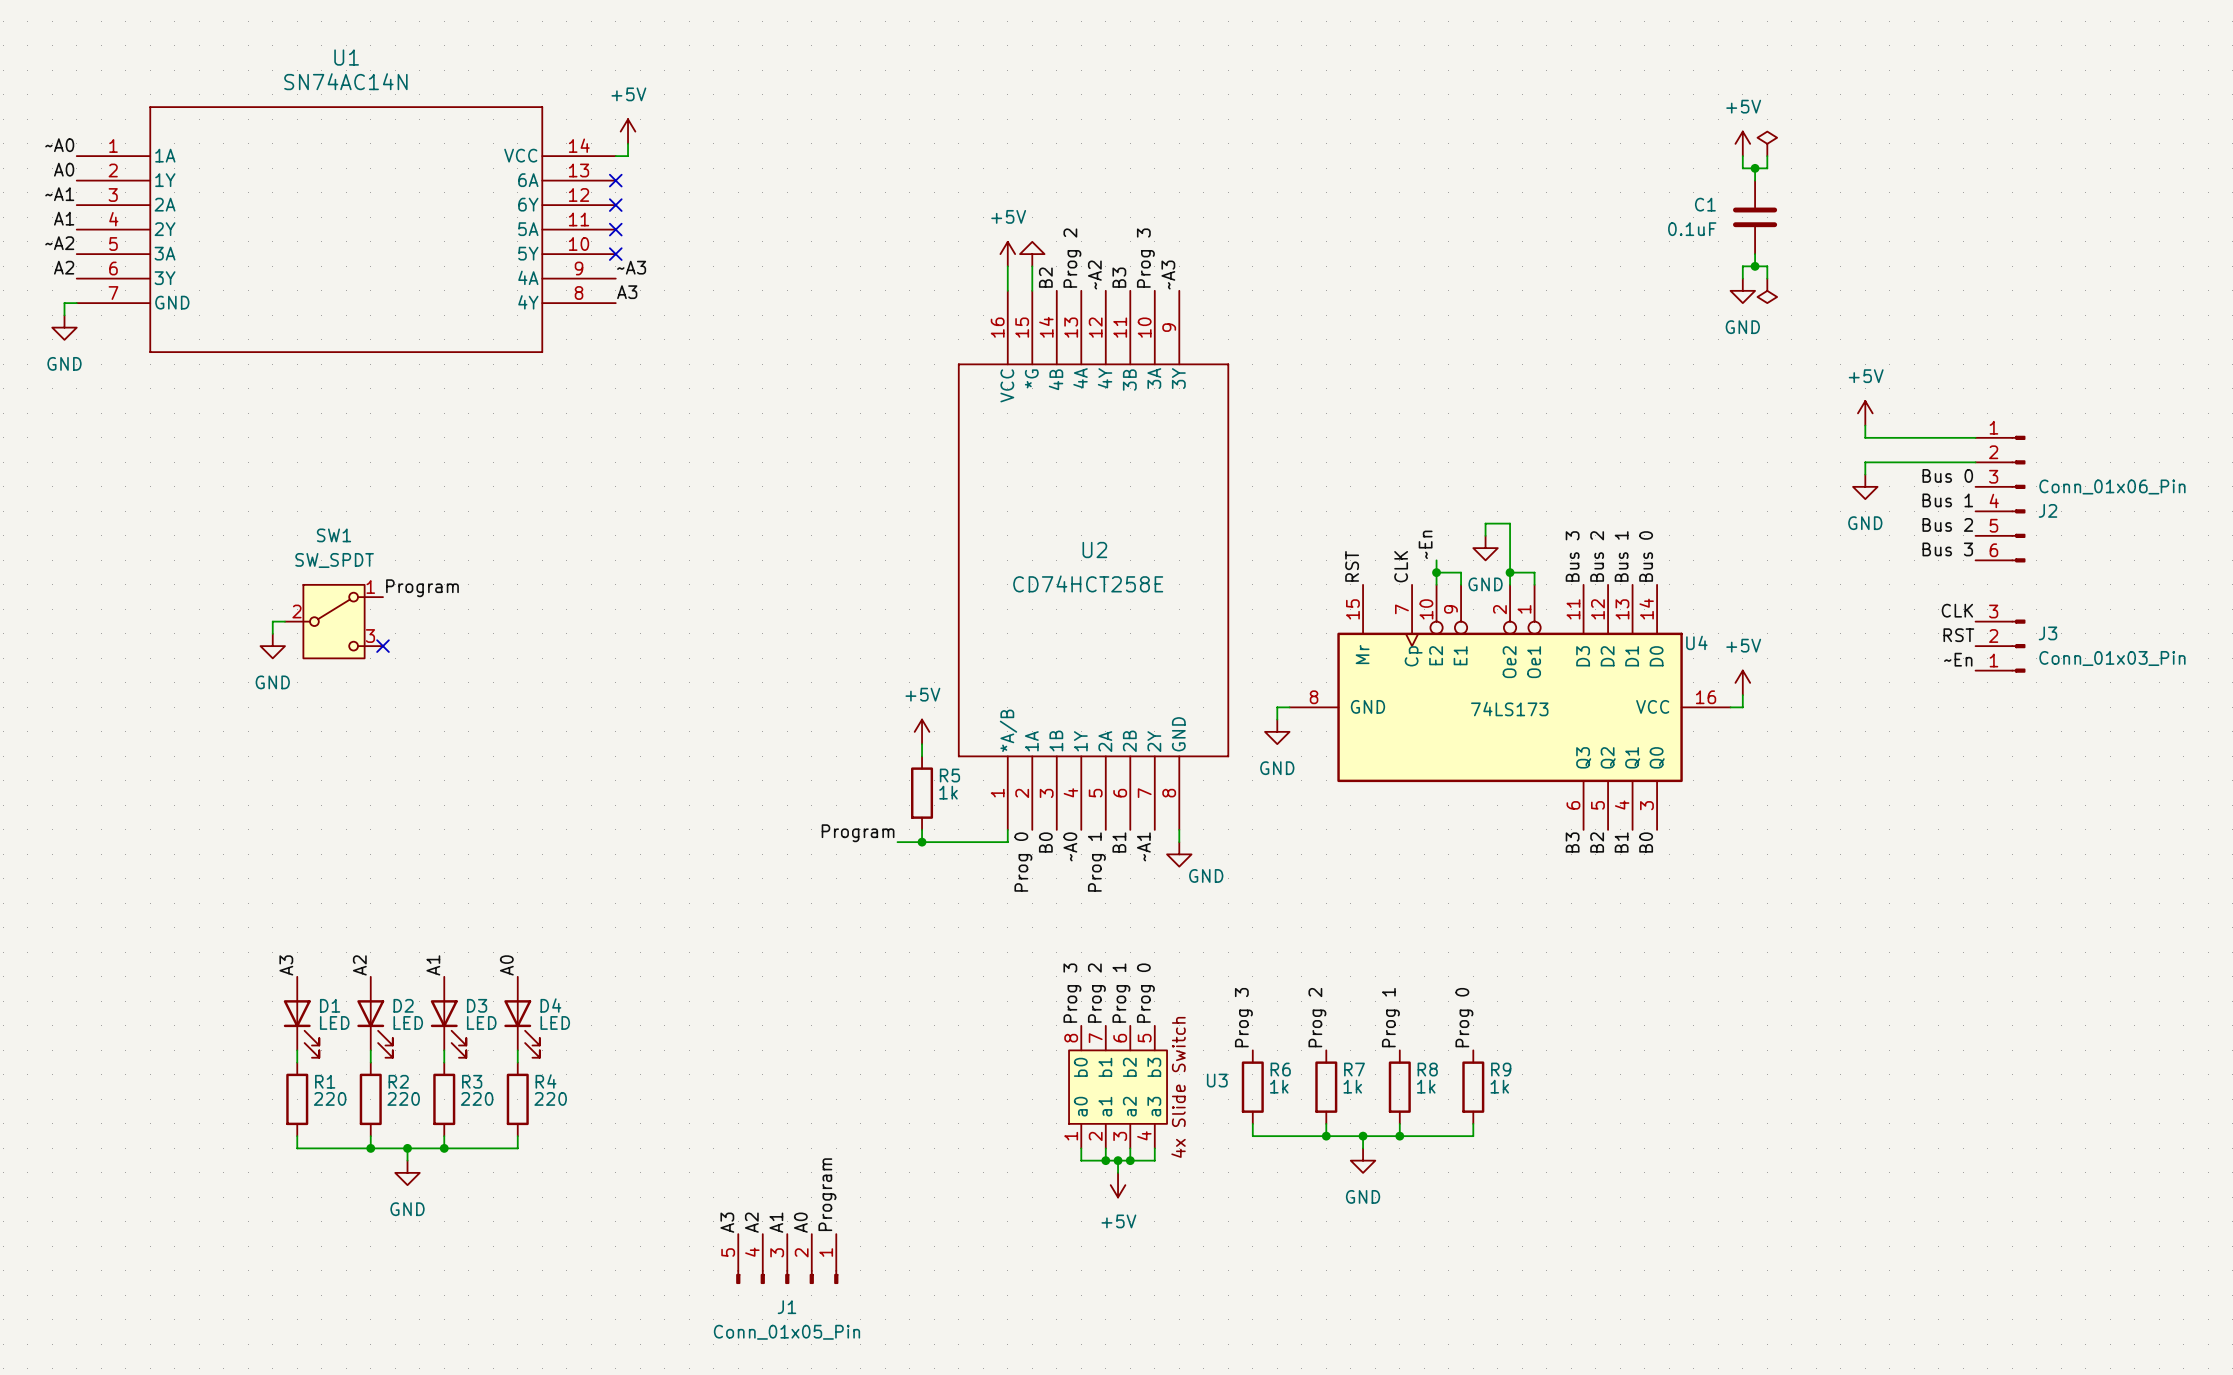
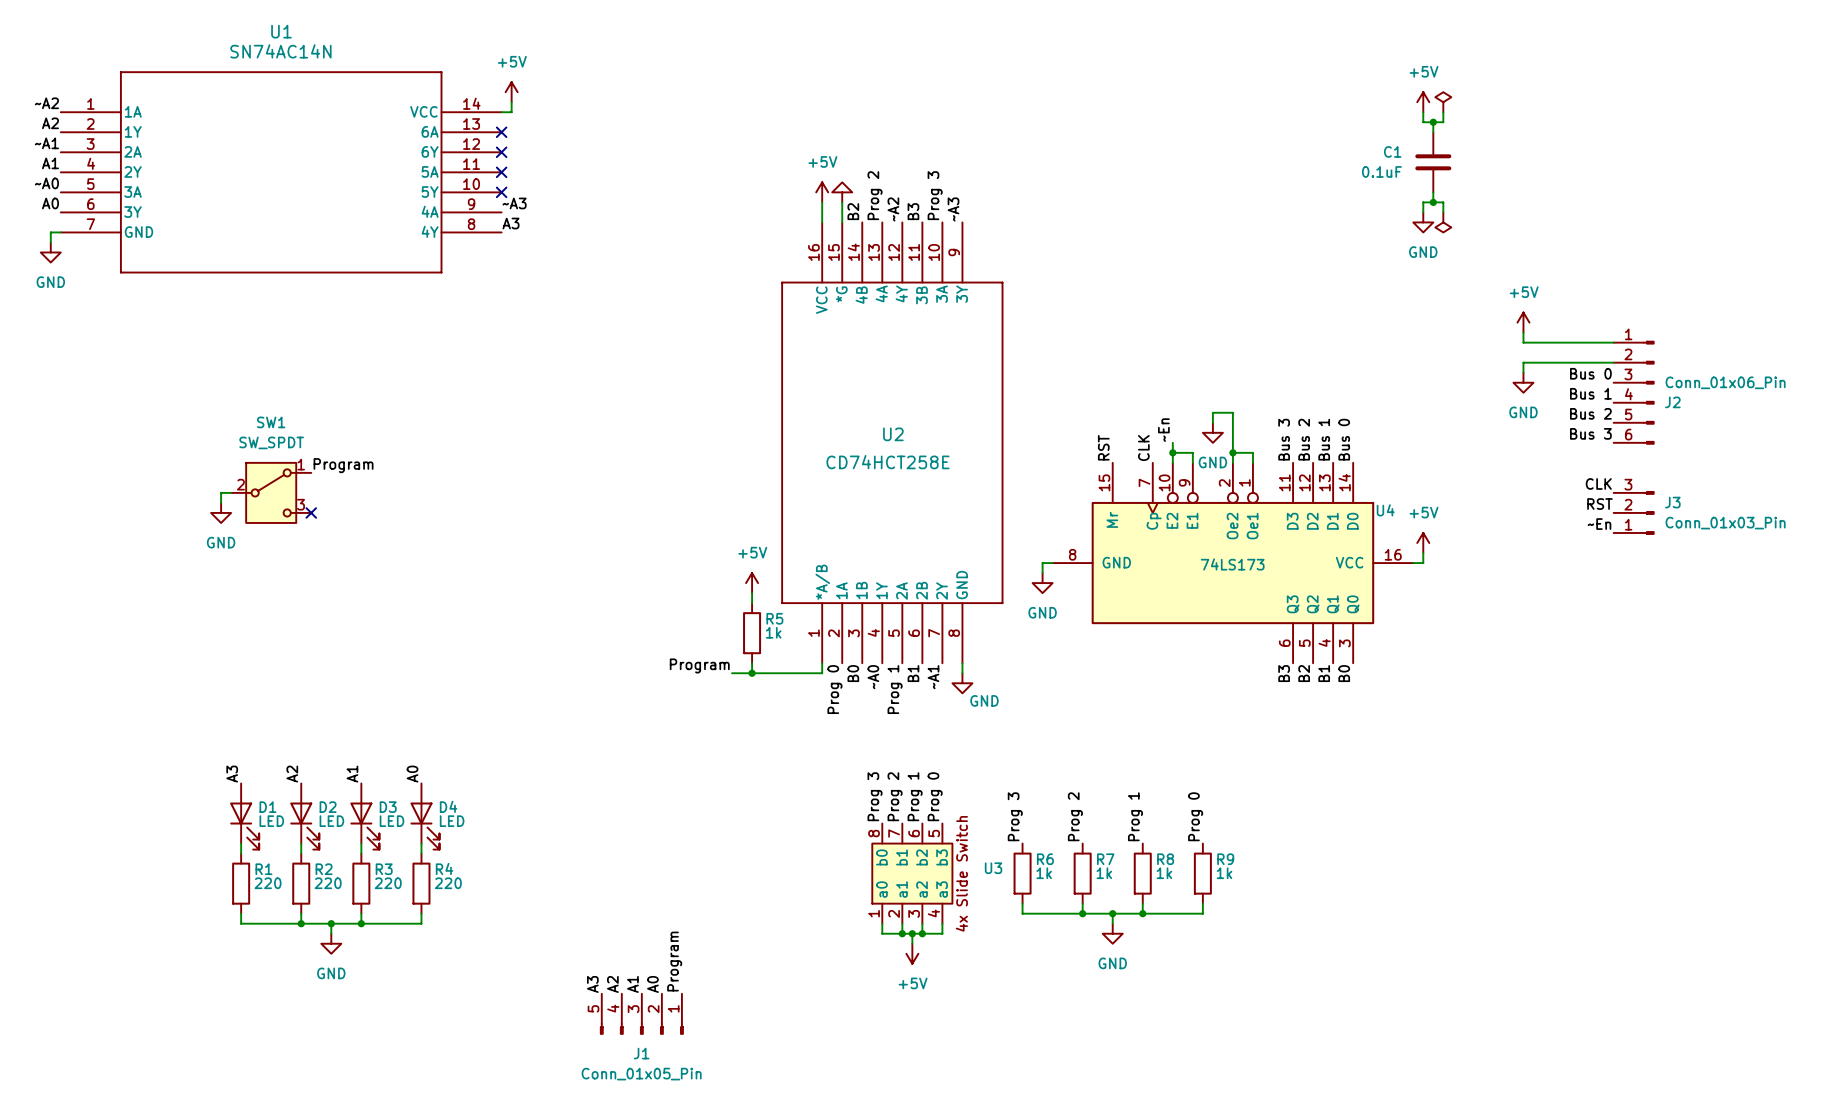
label: ~A0 (59, 145) -> ~A2 (46, 103)
label: A0 (64, 169) -> A2 (50, 123)
label: ~A2 (59, 243) -> ~A0 (46, 183)
label: A2 (64, 267) -> A0 (50, 203)

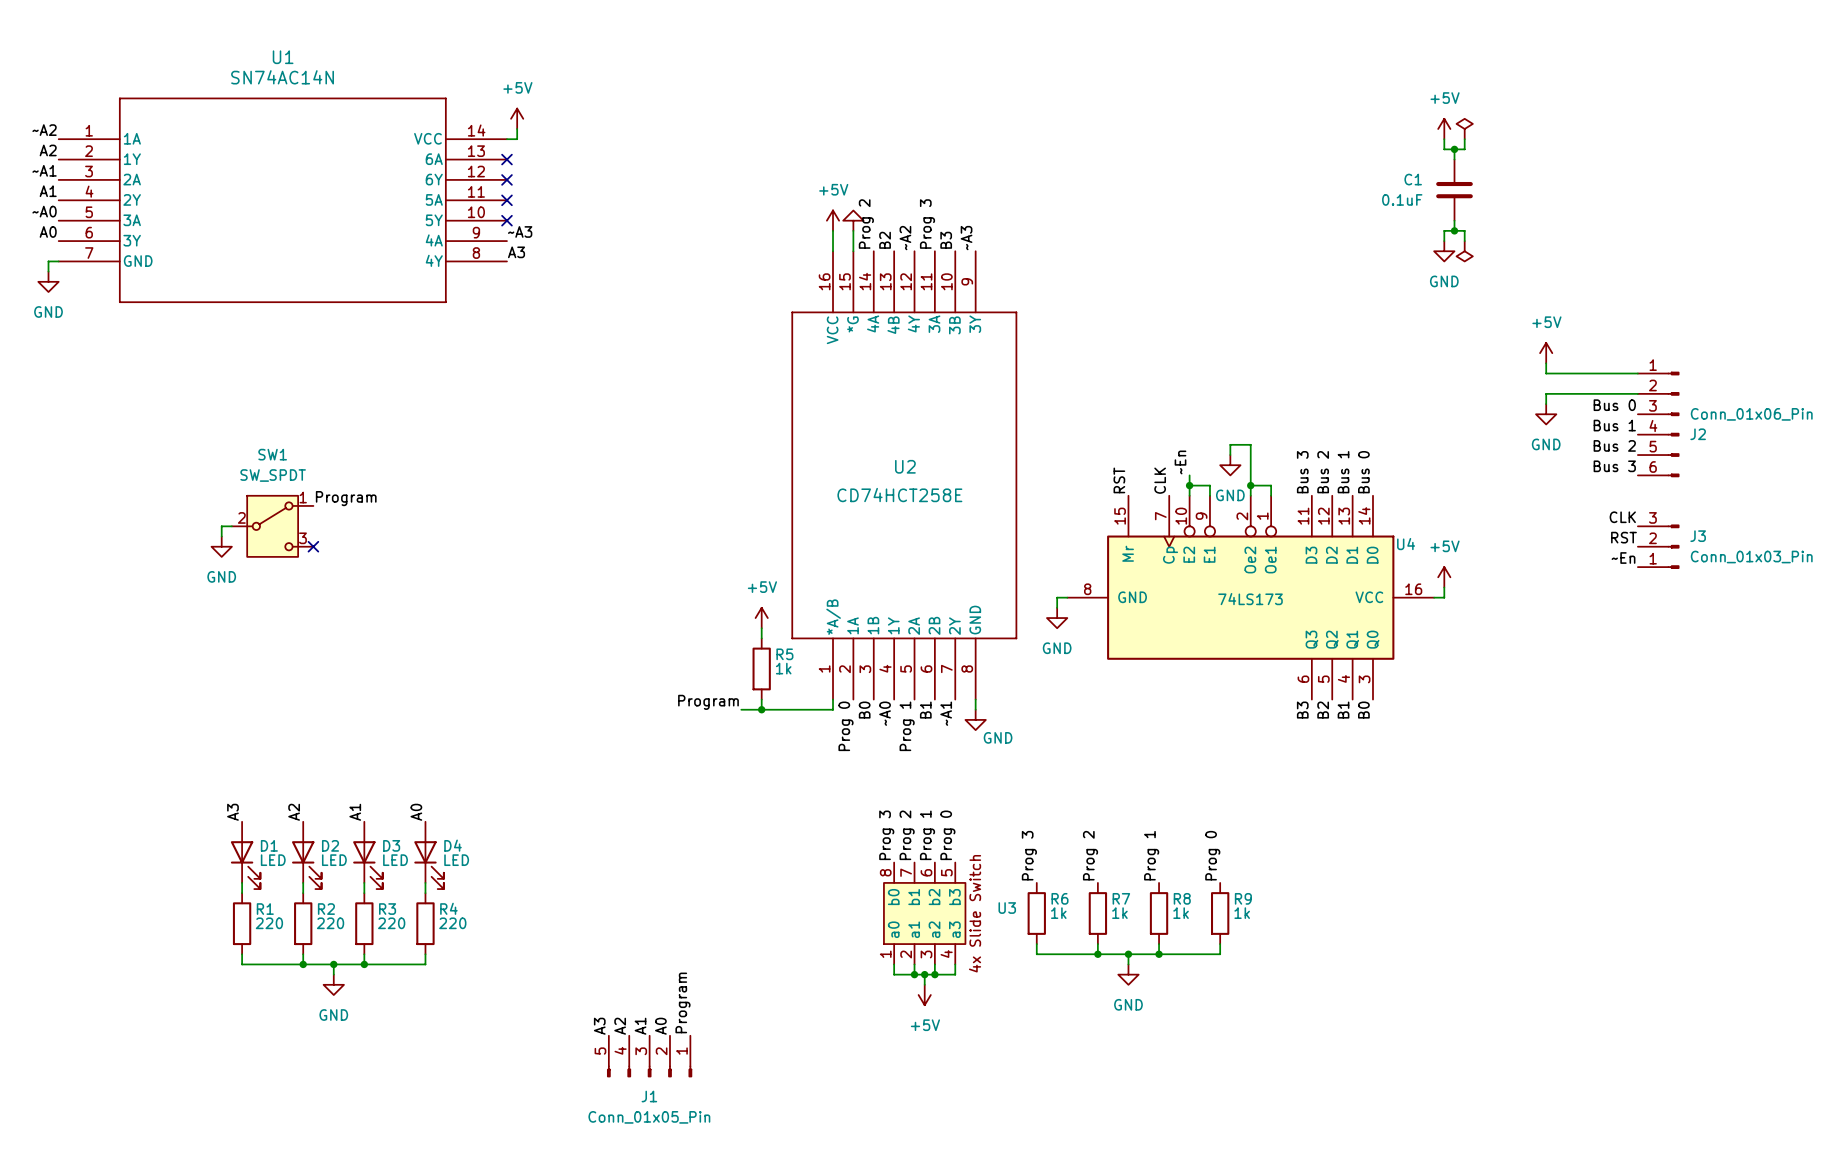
label: Prog 2 (875, 195) -> B2 (885, 240)
label: Prog 3 (935, 195) -> B3 (946, 240)
label: B2 (853, 211) -> Prog 2 (866, 224)
label: B3 (913, 211) -> Prog 3 (927, 224)
U2 pin name: 4A (881, 293) -> 4B (893, 325)
U2 pin name: 3A (942, 294) -> 3B (954, 325)
U2 pin name: 4B (861, 295) -> 4A (873, 323)
U2 pin name: 3B (922, 295) -> 3A (934, 324)

